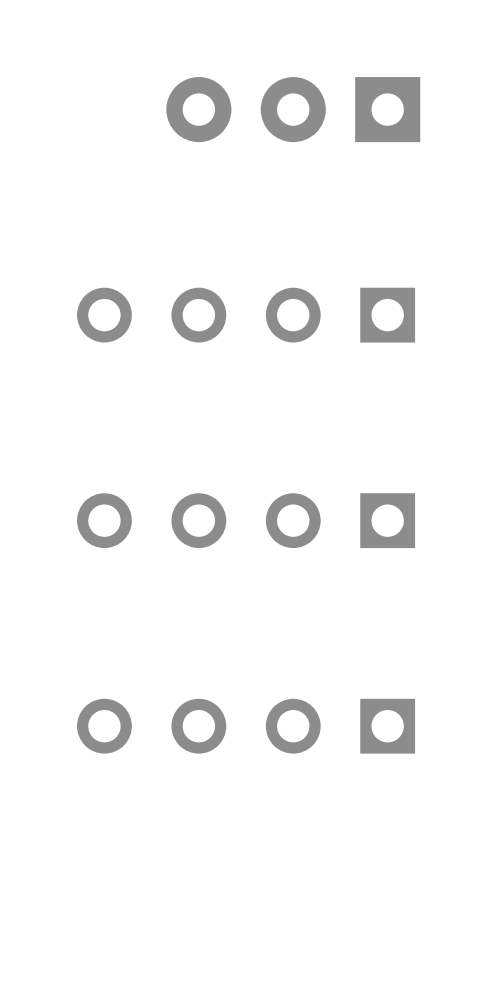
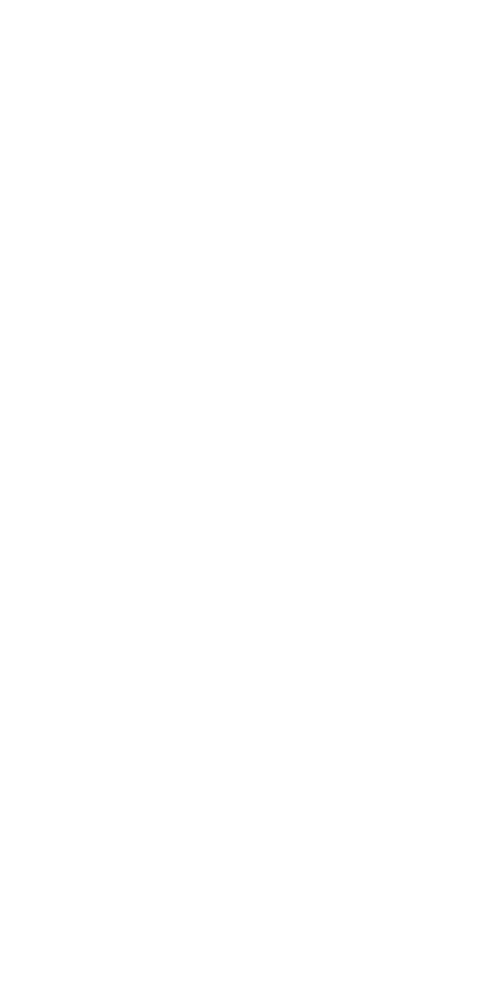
part: (293, 109) -> none
part: (246, 315) -> none
part: (246, 520) -> none
part: (246, 726) -> none

